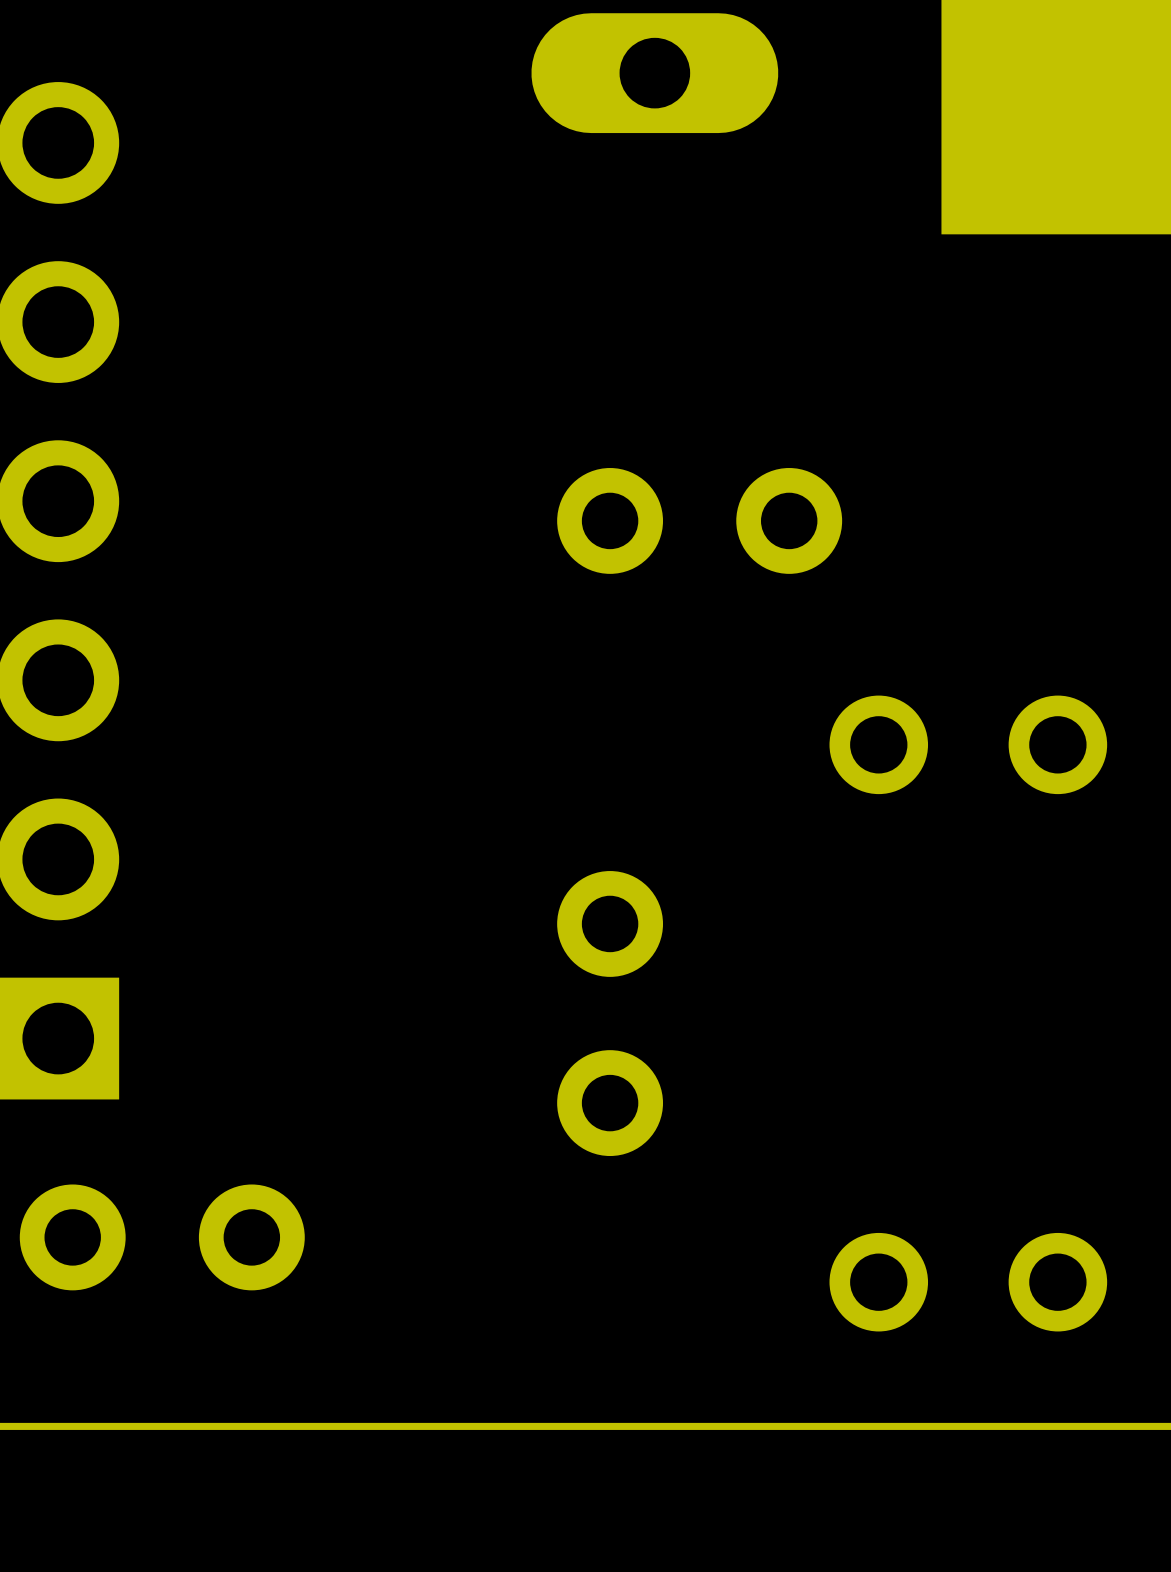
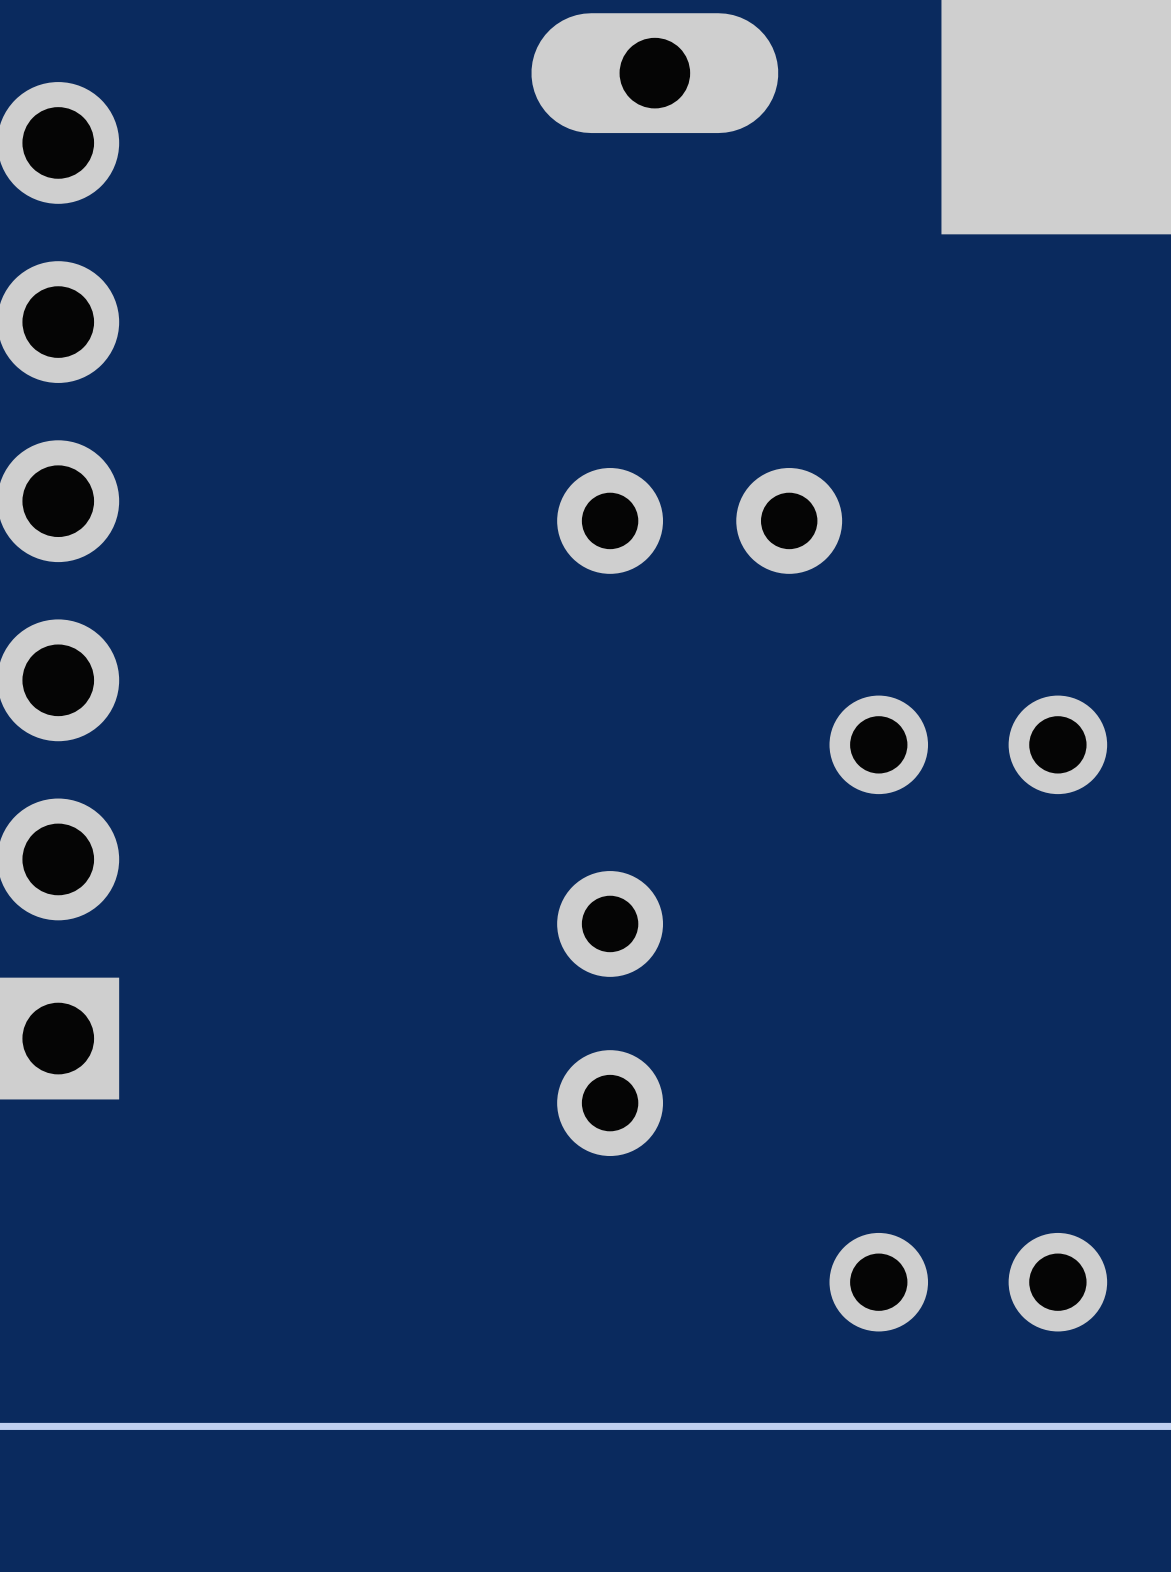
part: (162, 1237) -> none

